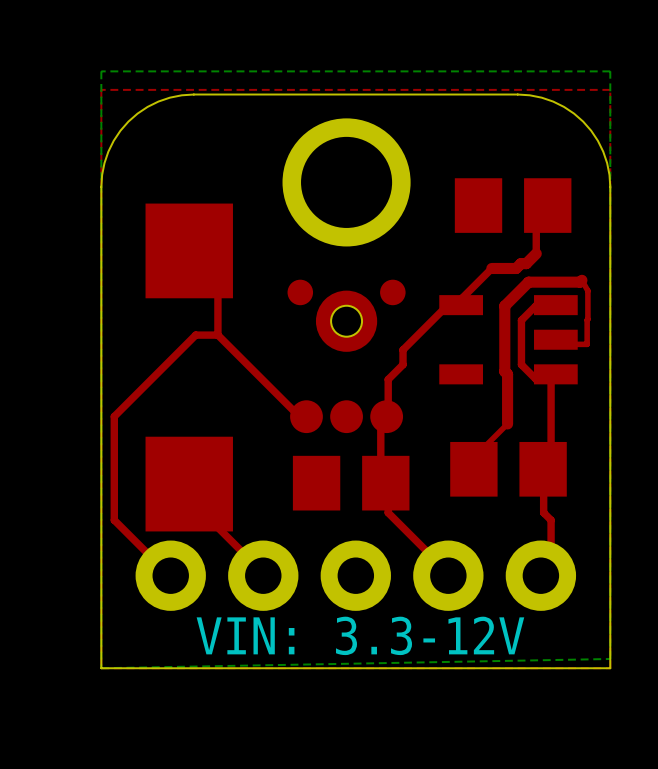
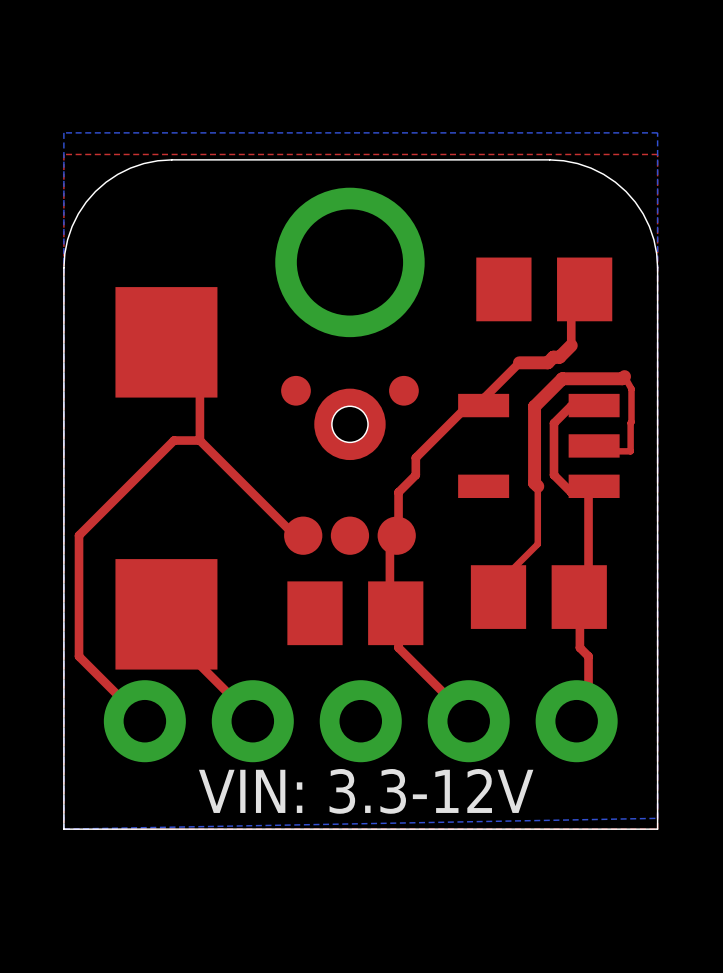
top track width: thick (507, 374) (507, 423) -> thin (537, 486) (537, 544)

